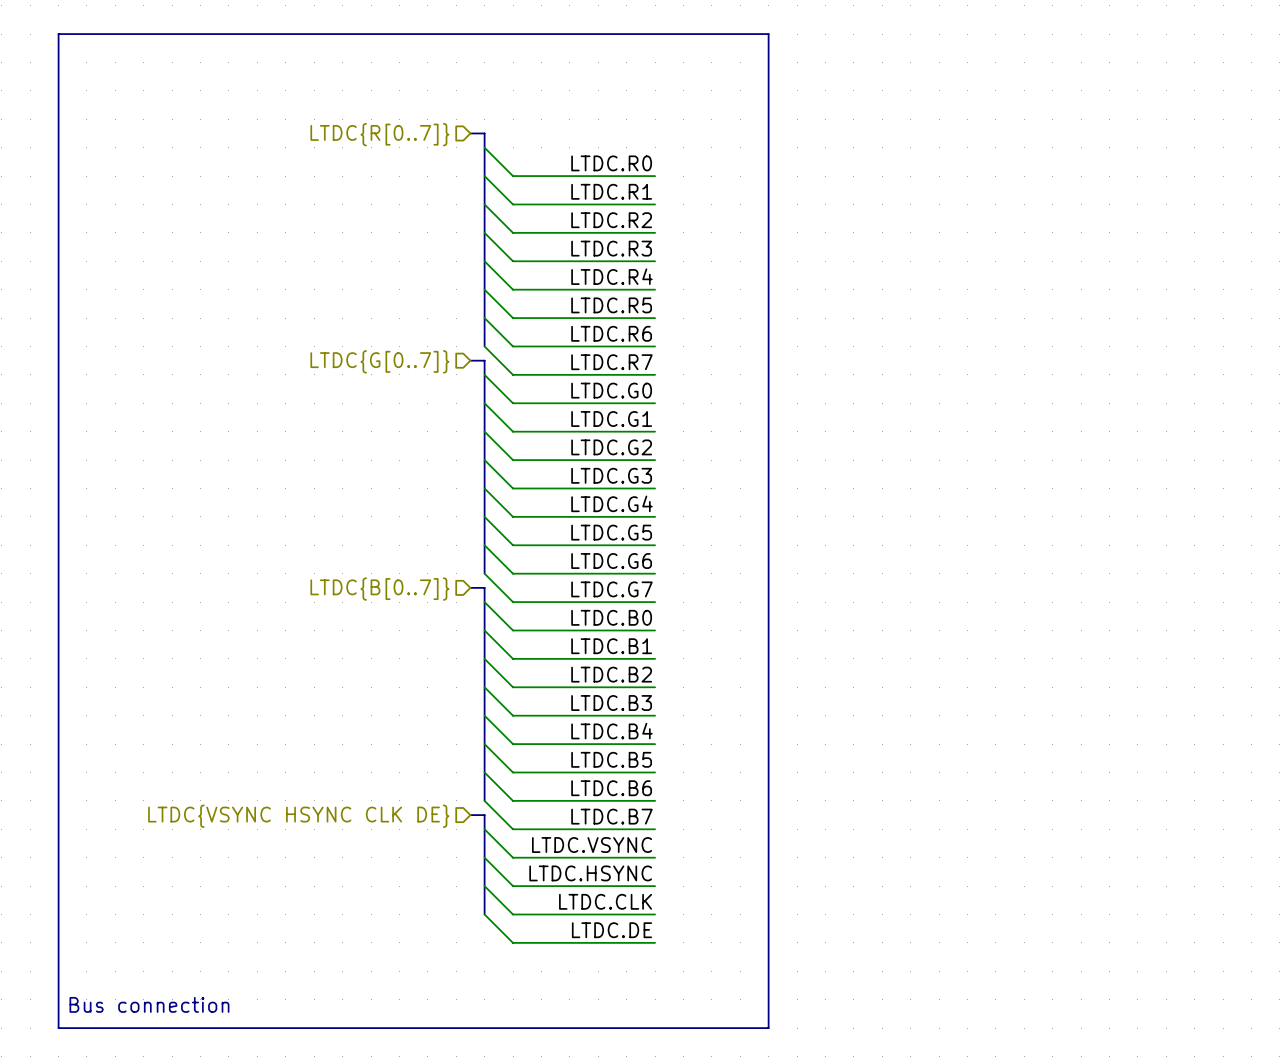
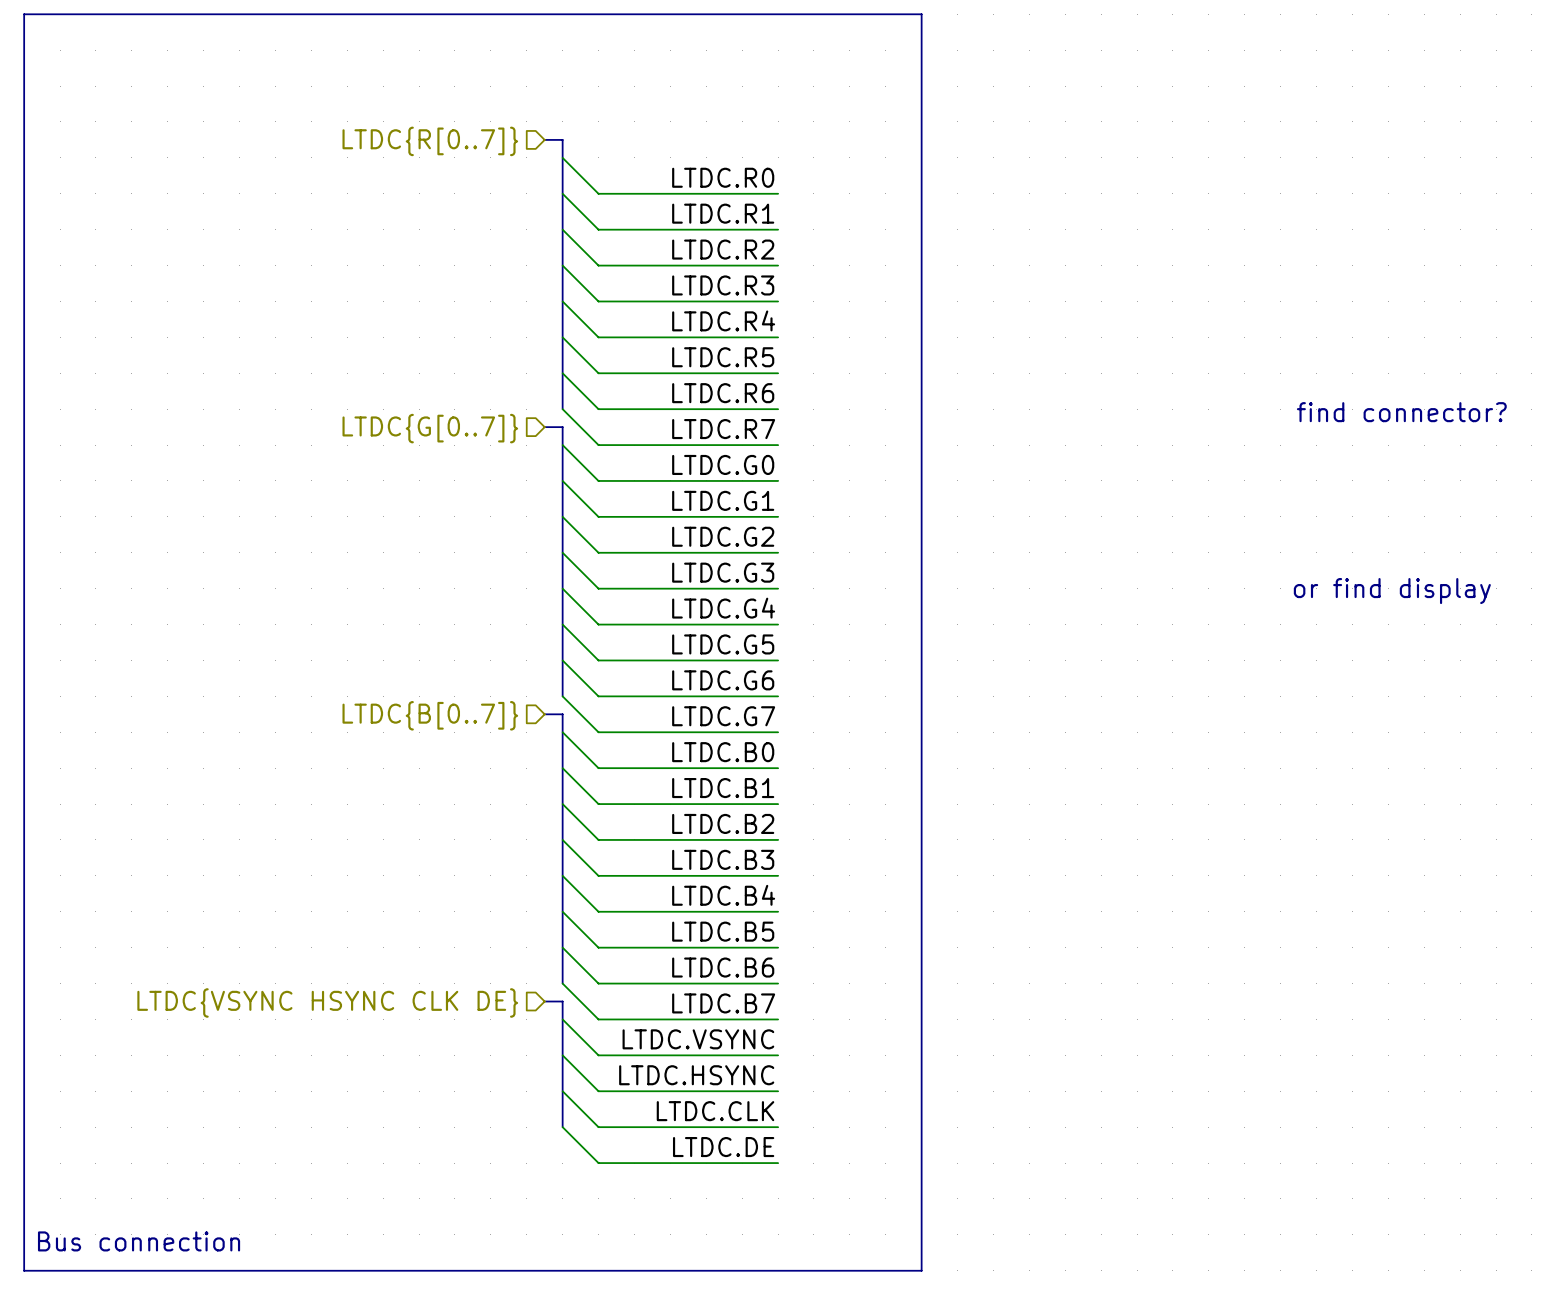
text: none -> find connector? (1401, 412)
text: none -> or find display (1392, 591)

